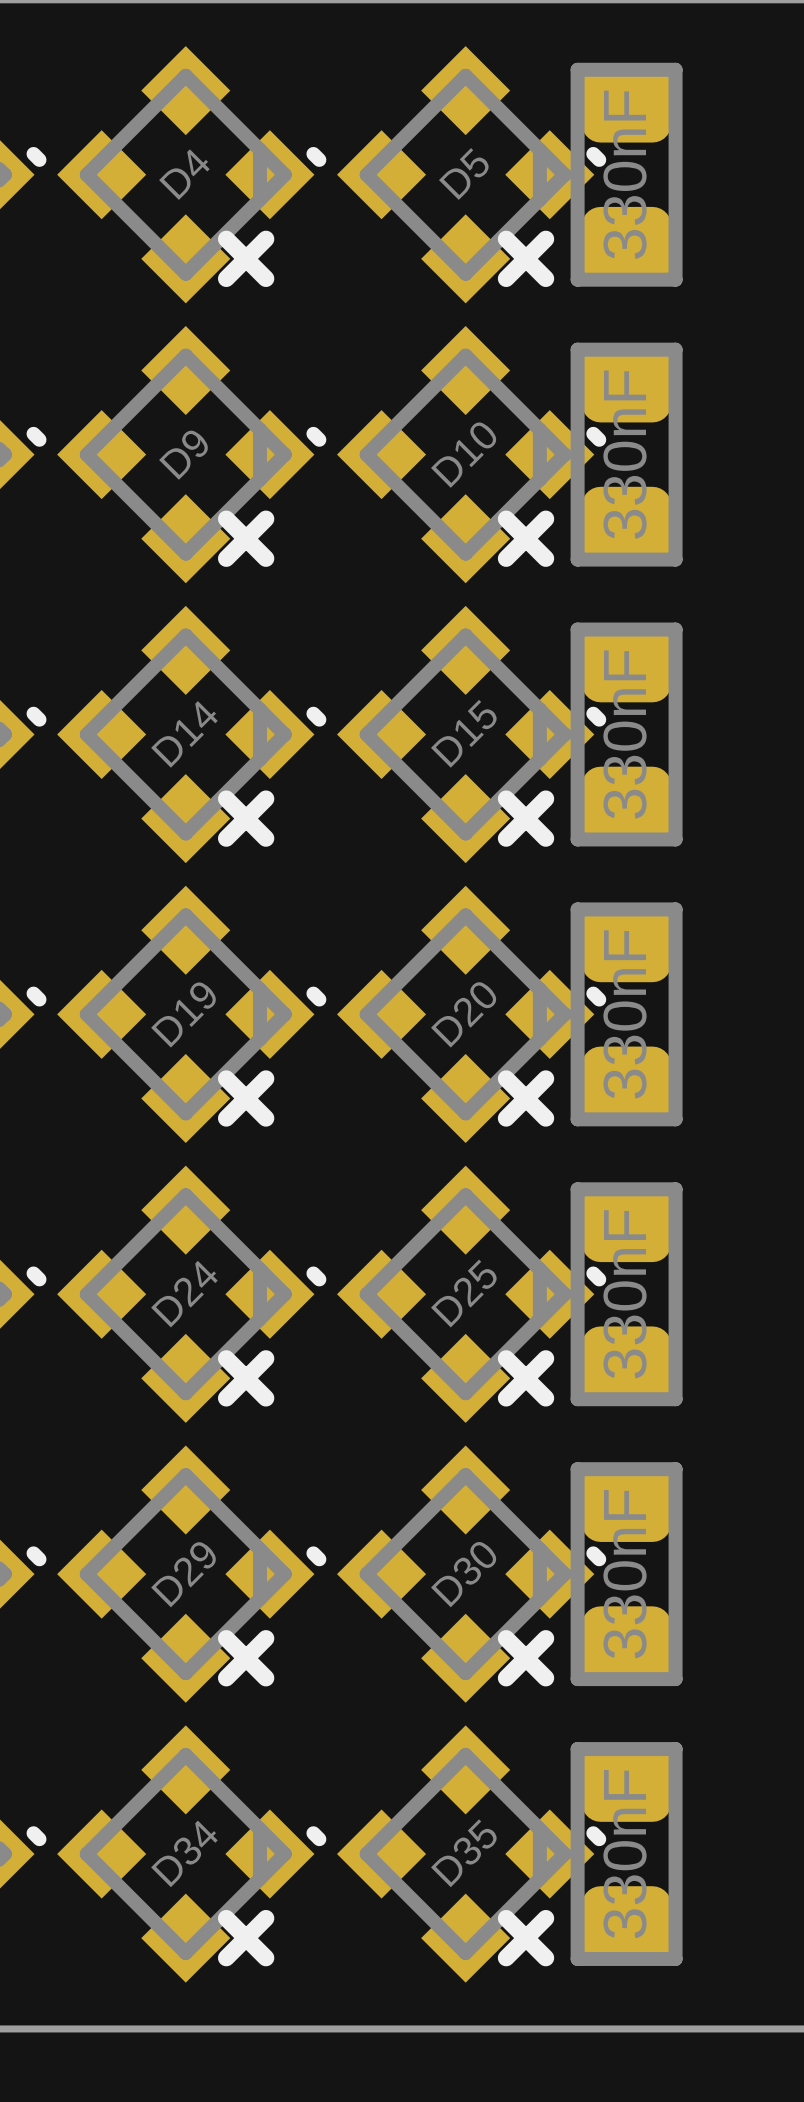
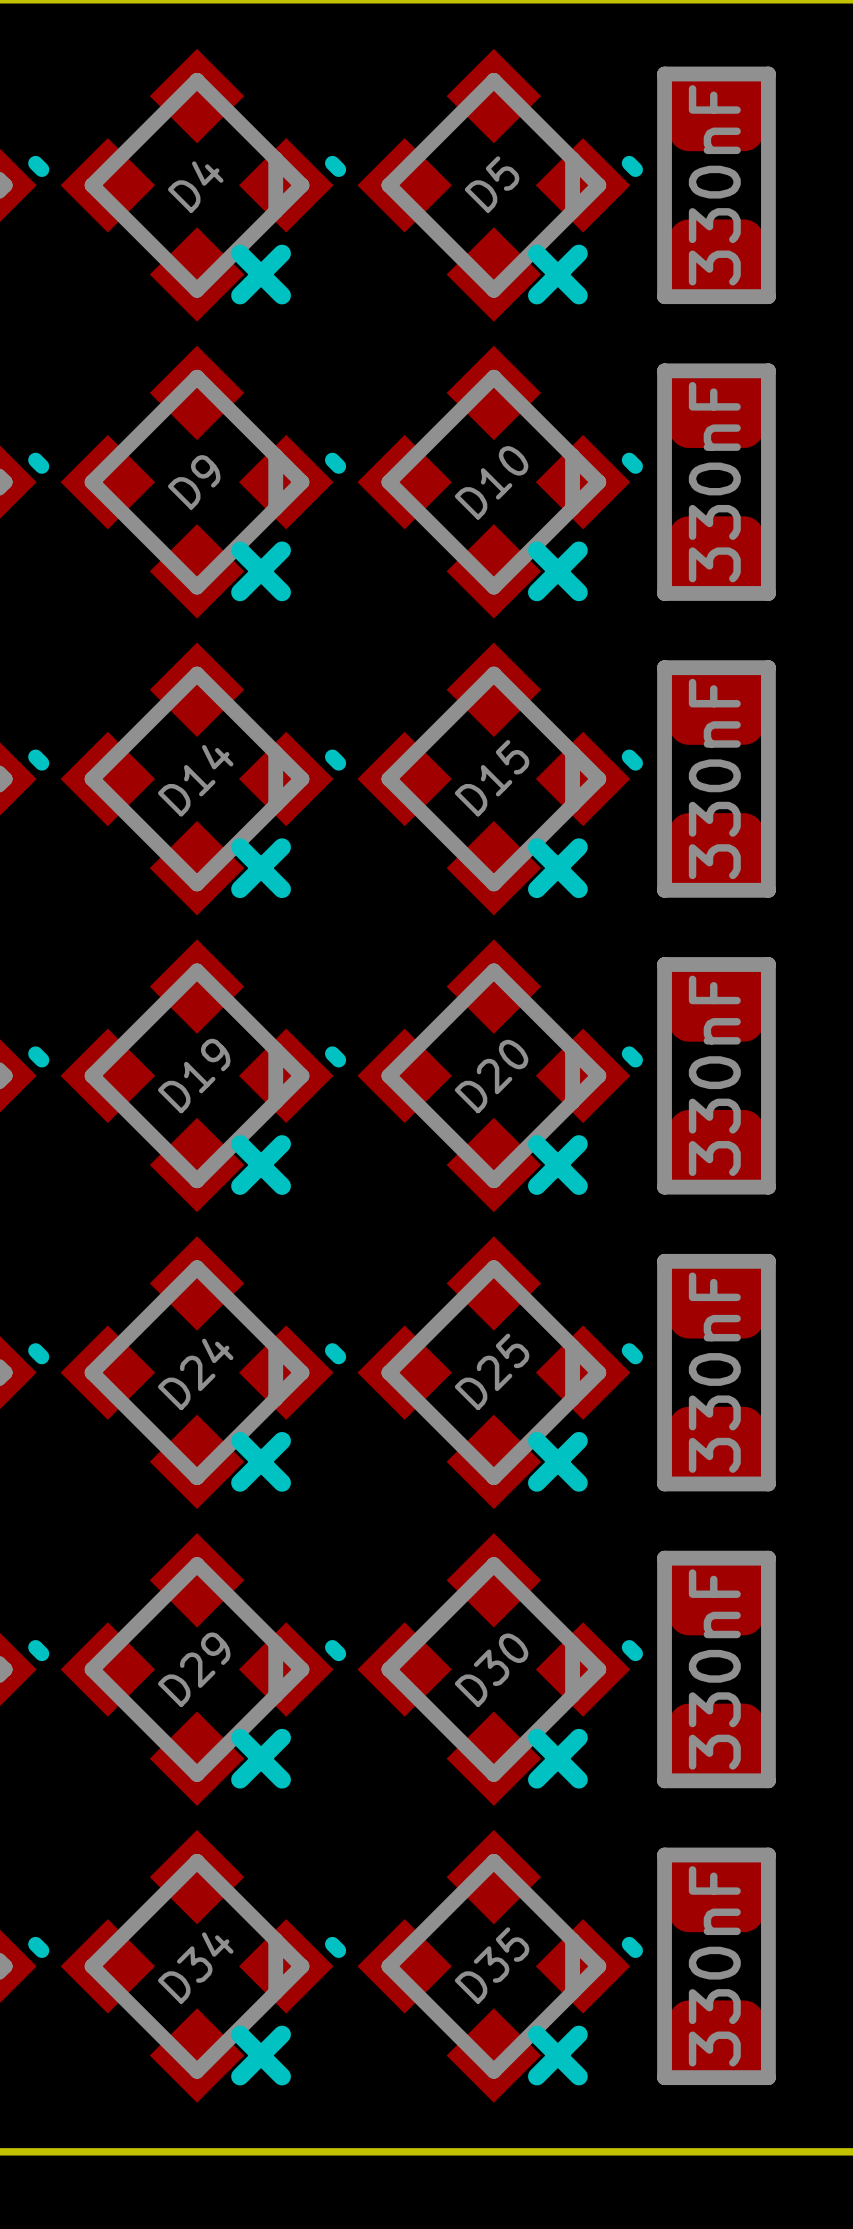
part position: (626, 174) -> (716, 185)
part position: (626, 454) -> (716, 482)
part position: (626, 734) -> (716, 778)
part position: (626, 1014) -> (716, 1075)
part position: (626, 1294) -> (716, 1372)
part position: (626, 1574) -> (716, 1669)
part position: (626, 1854) -> (716, 1966)

